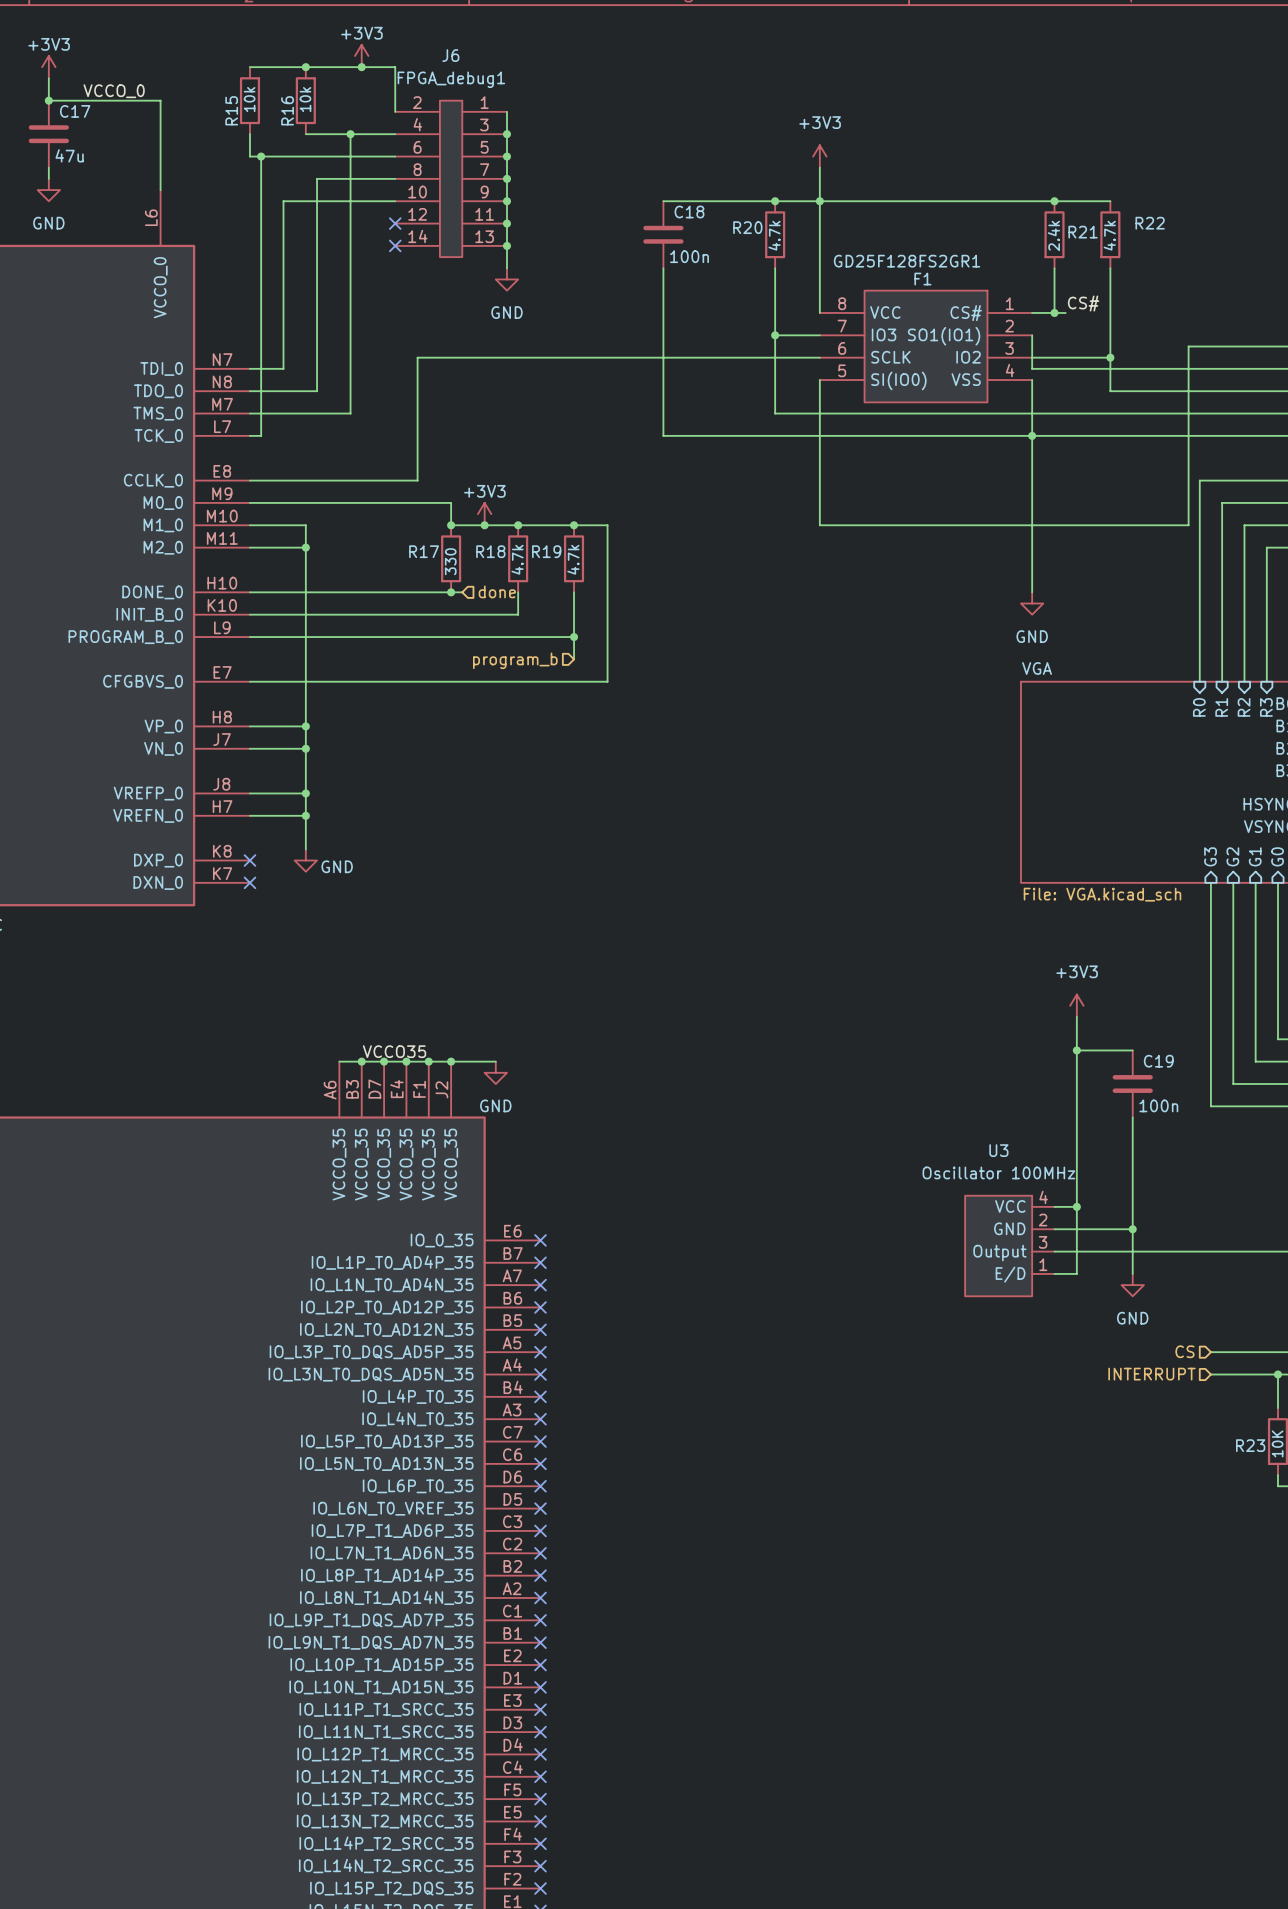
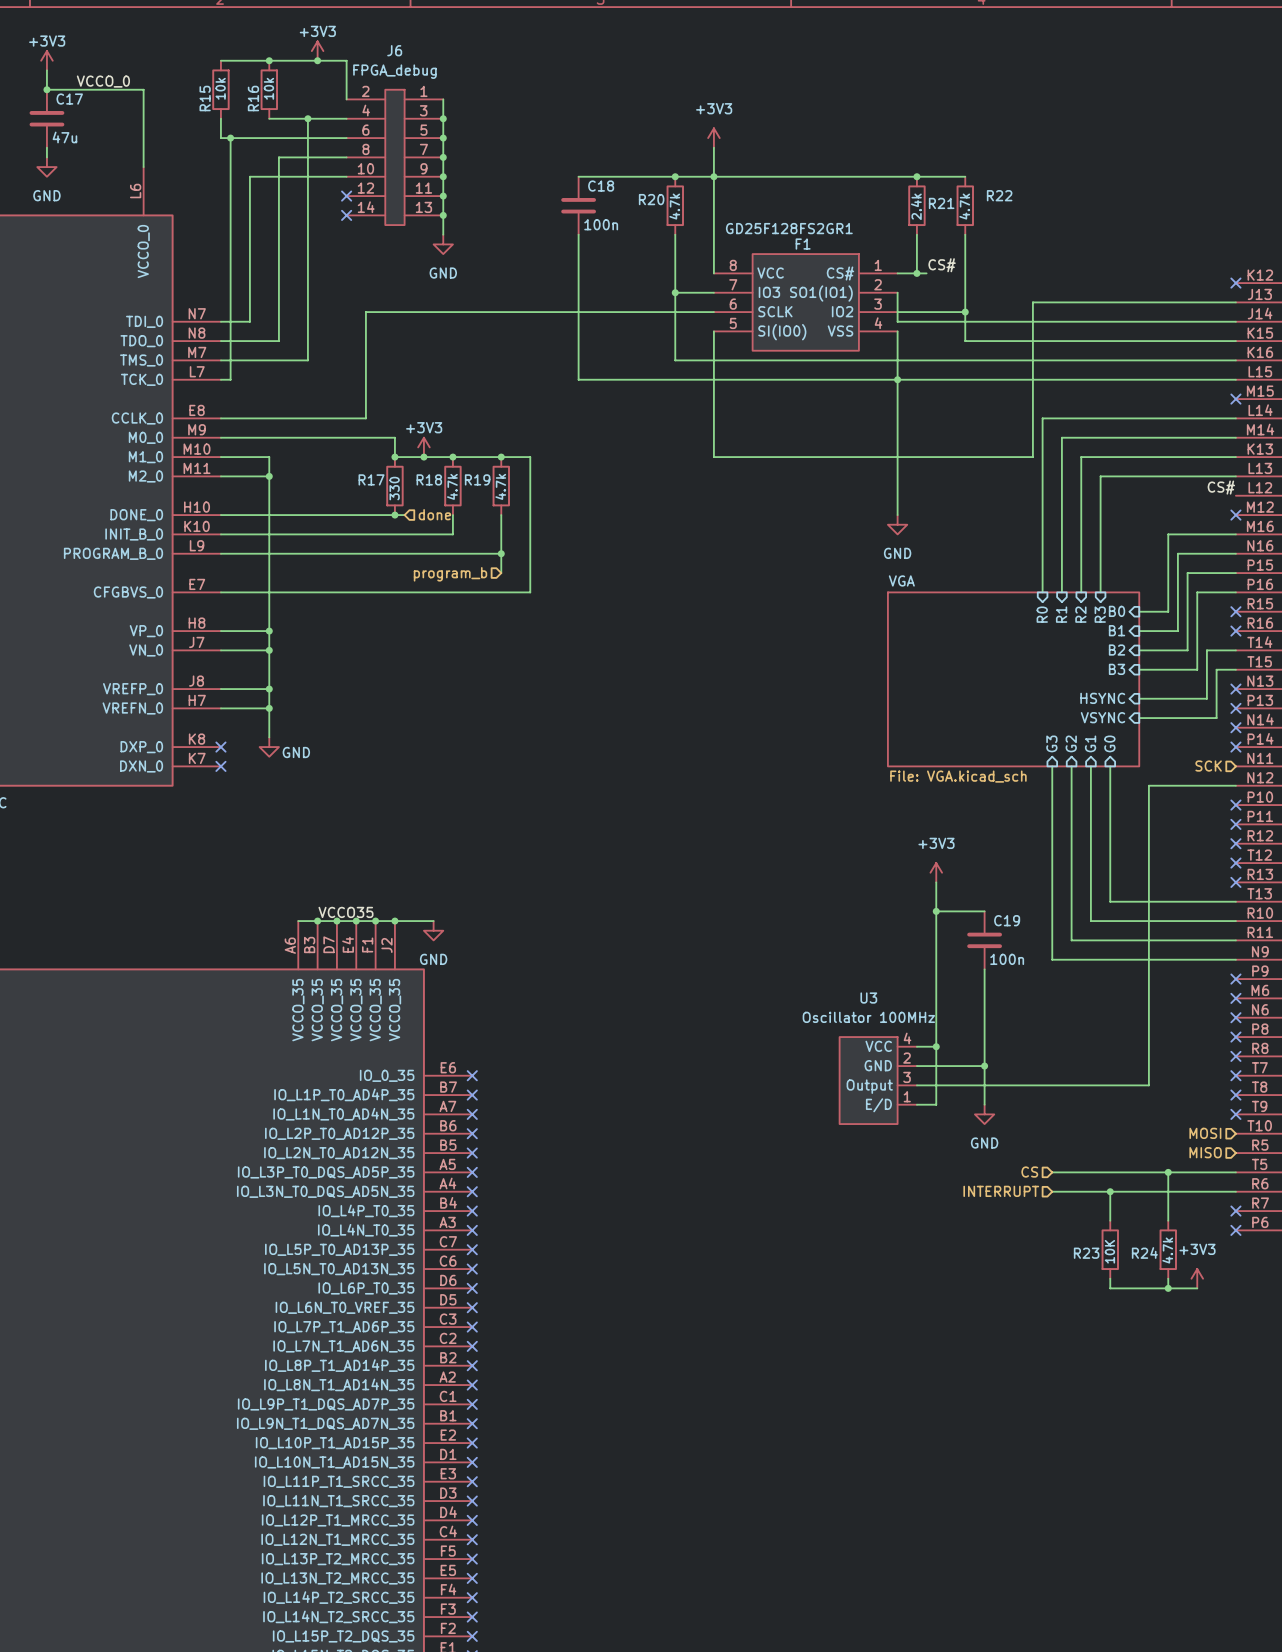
J6 value: FPGA_debug1 (451, 79) -> FPGA_debug (394, 71)

